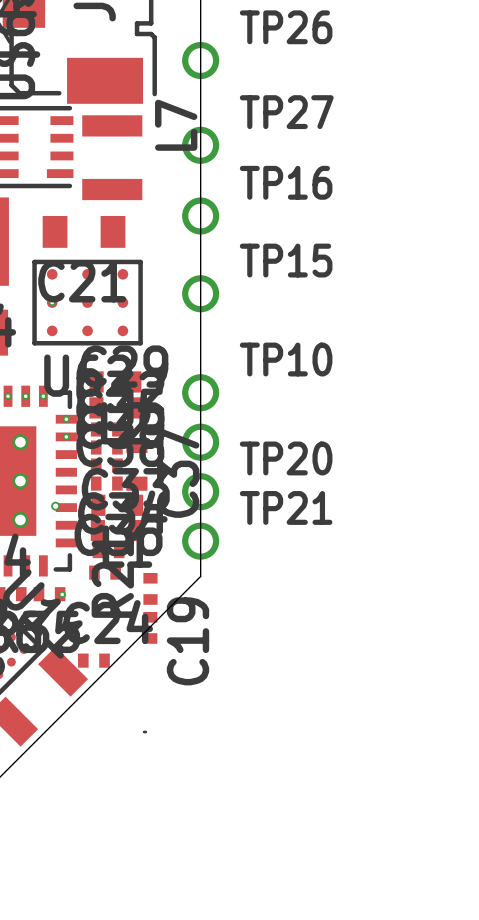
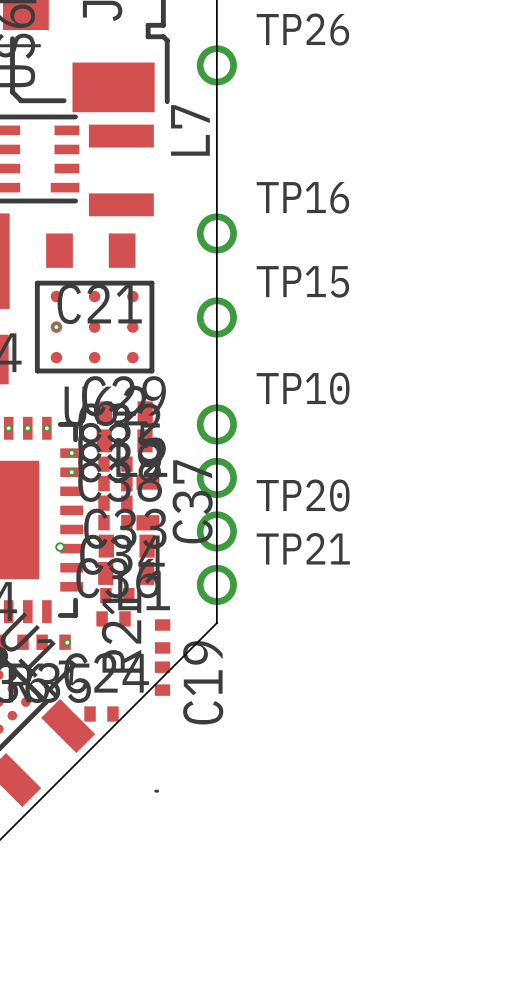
TP27: (200, 145) -> none
via: (20, 442) -> none
via: (20, 481) -> none
via: (20, 519) -> none

